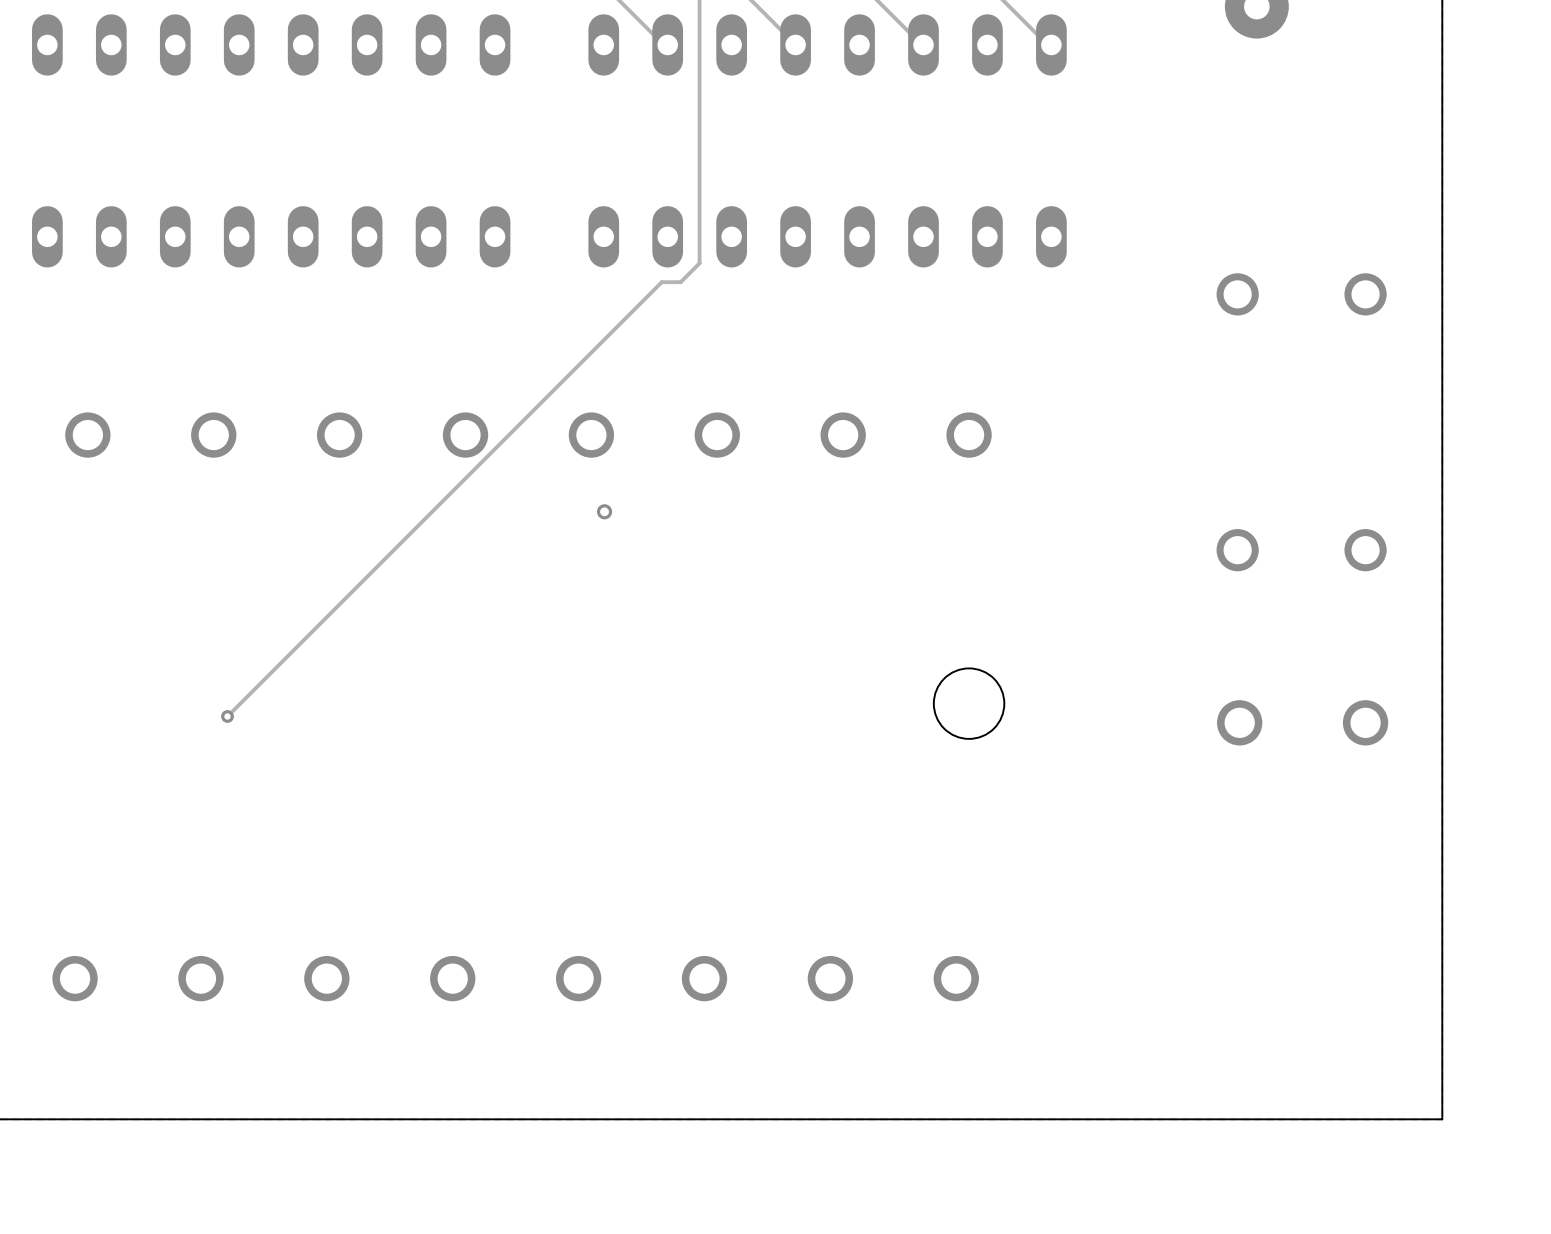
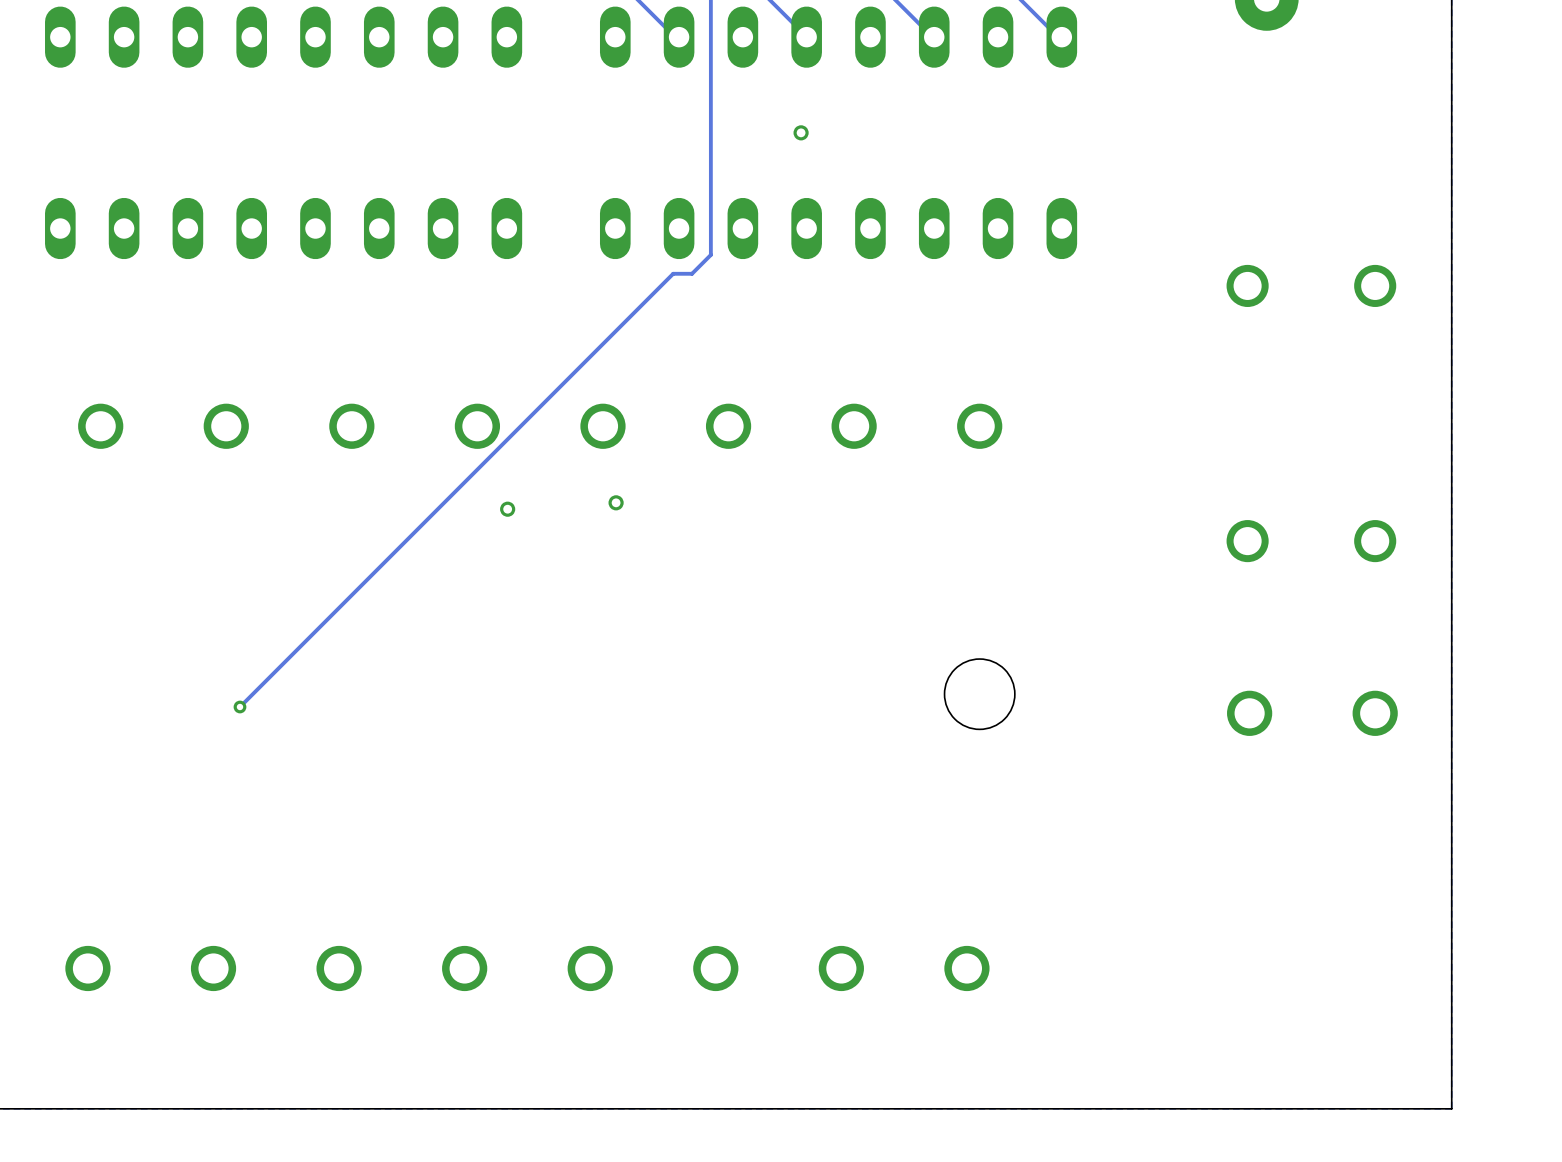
via: none -> (801, 132)
via: none -> (507, 509)

